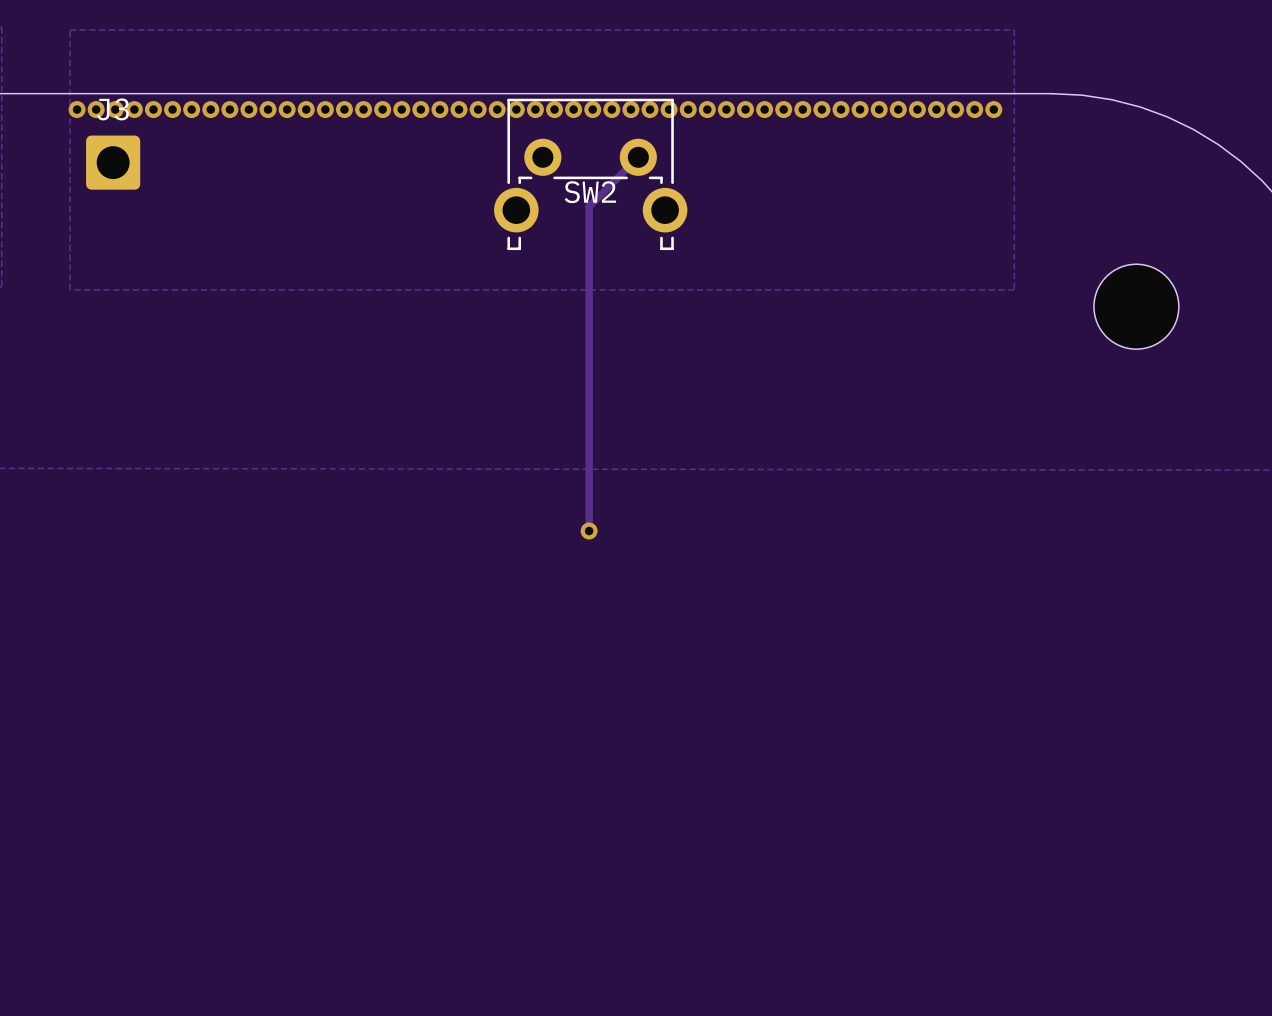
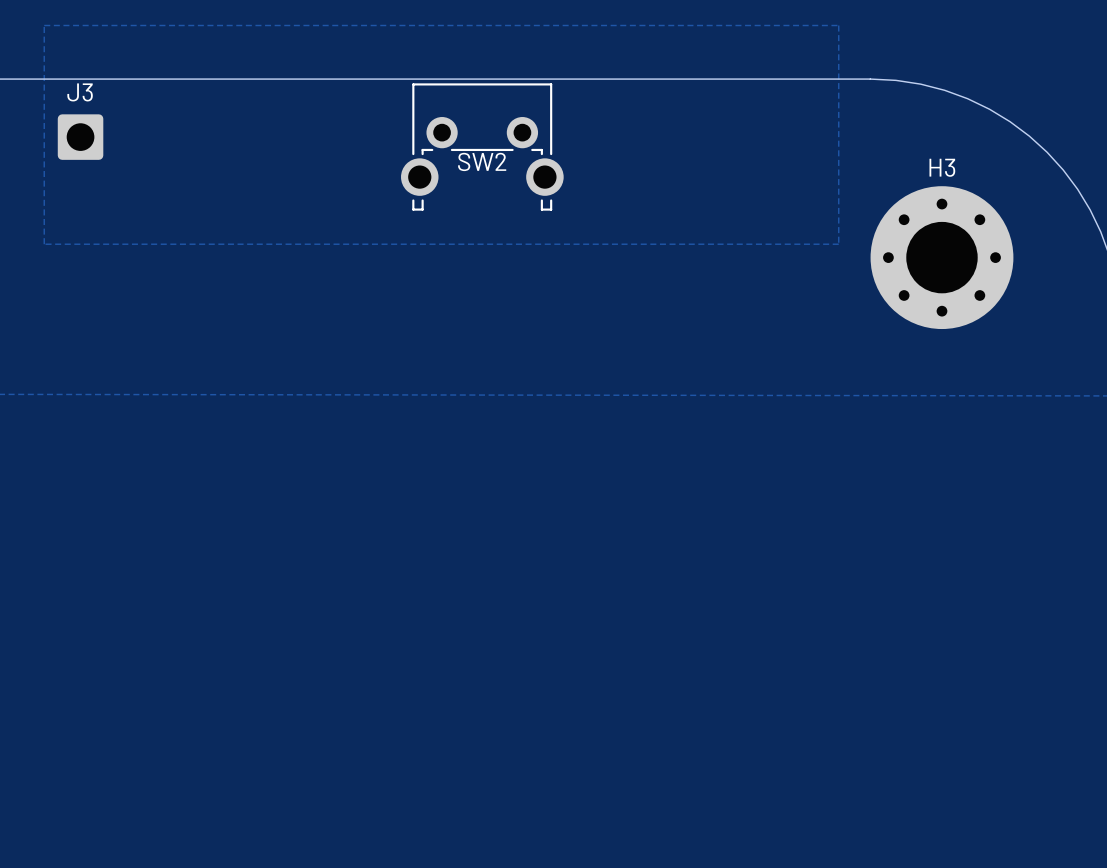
via: (77, 109) -> none
via: (96, 109) -> none
via: (115, 109) -> none
via: (134, 109) -> none
via: (153, 109) -> none
via: (172, 109) -> none
via: (191, 109) -> none
via: (210, 109) -> none
via: (229, 109) -> none
via: (248, 109) -> none
via: (268, 109) -> none
via: (287, 109) -> none
via: (306, 109) -> none
via: (325, 109) -> none
via: (344, 109) -> none
via: (363, 109) -> none
via: (382, 109) -> none
via: (401, 109) -> none
via: (420, 109) -> none
via: (439, 109) -> none
via: (459, 109) -> none
via: (478, 109) -> none
via: (497, 109) -> none
via: (516, 109) -> none
via: (535, 109) -> none
via: (554, 109) -> none
via: (573, 109) -> none
via: (592, 109) -> none
via: (611, 109) -> none
via: (630, 109) -> none
via: (650, 109) -> none
via: (669, 109) -> none
via: (688, 109) -> none
via: (707, 109) -> none
via: (726, 109) -> none
via: (745, 109) -> none
via: (764, 109) -> none
via: (783, 109) -> none
via: (802, 109) -> none
via: (821, 109) -> none
via: (841, 109) -> none
via: (860, 109) -> none
via: (879, 109) -> none
via: (898, 109) -> none
via: (917, 109) -> none
via: (936, 109) -> none
via: (955, 109) -> none
via: (974, 109) -> none
via: (993, 109) -> none
track: (638, 157) (589, 206) (589, 531) -> none
H3: none -> (941, 257)
part: (1136, 306) -> none
via: (589, 531) -> none

